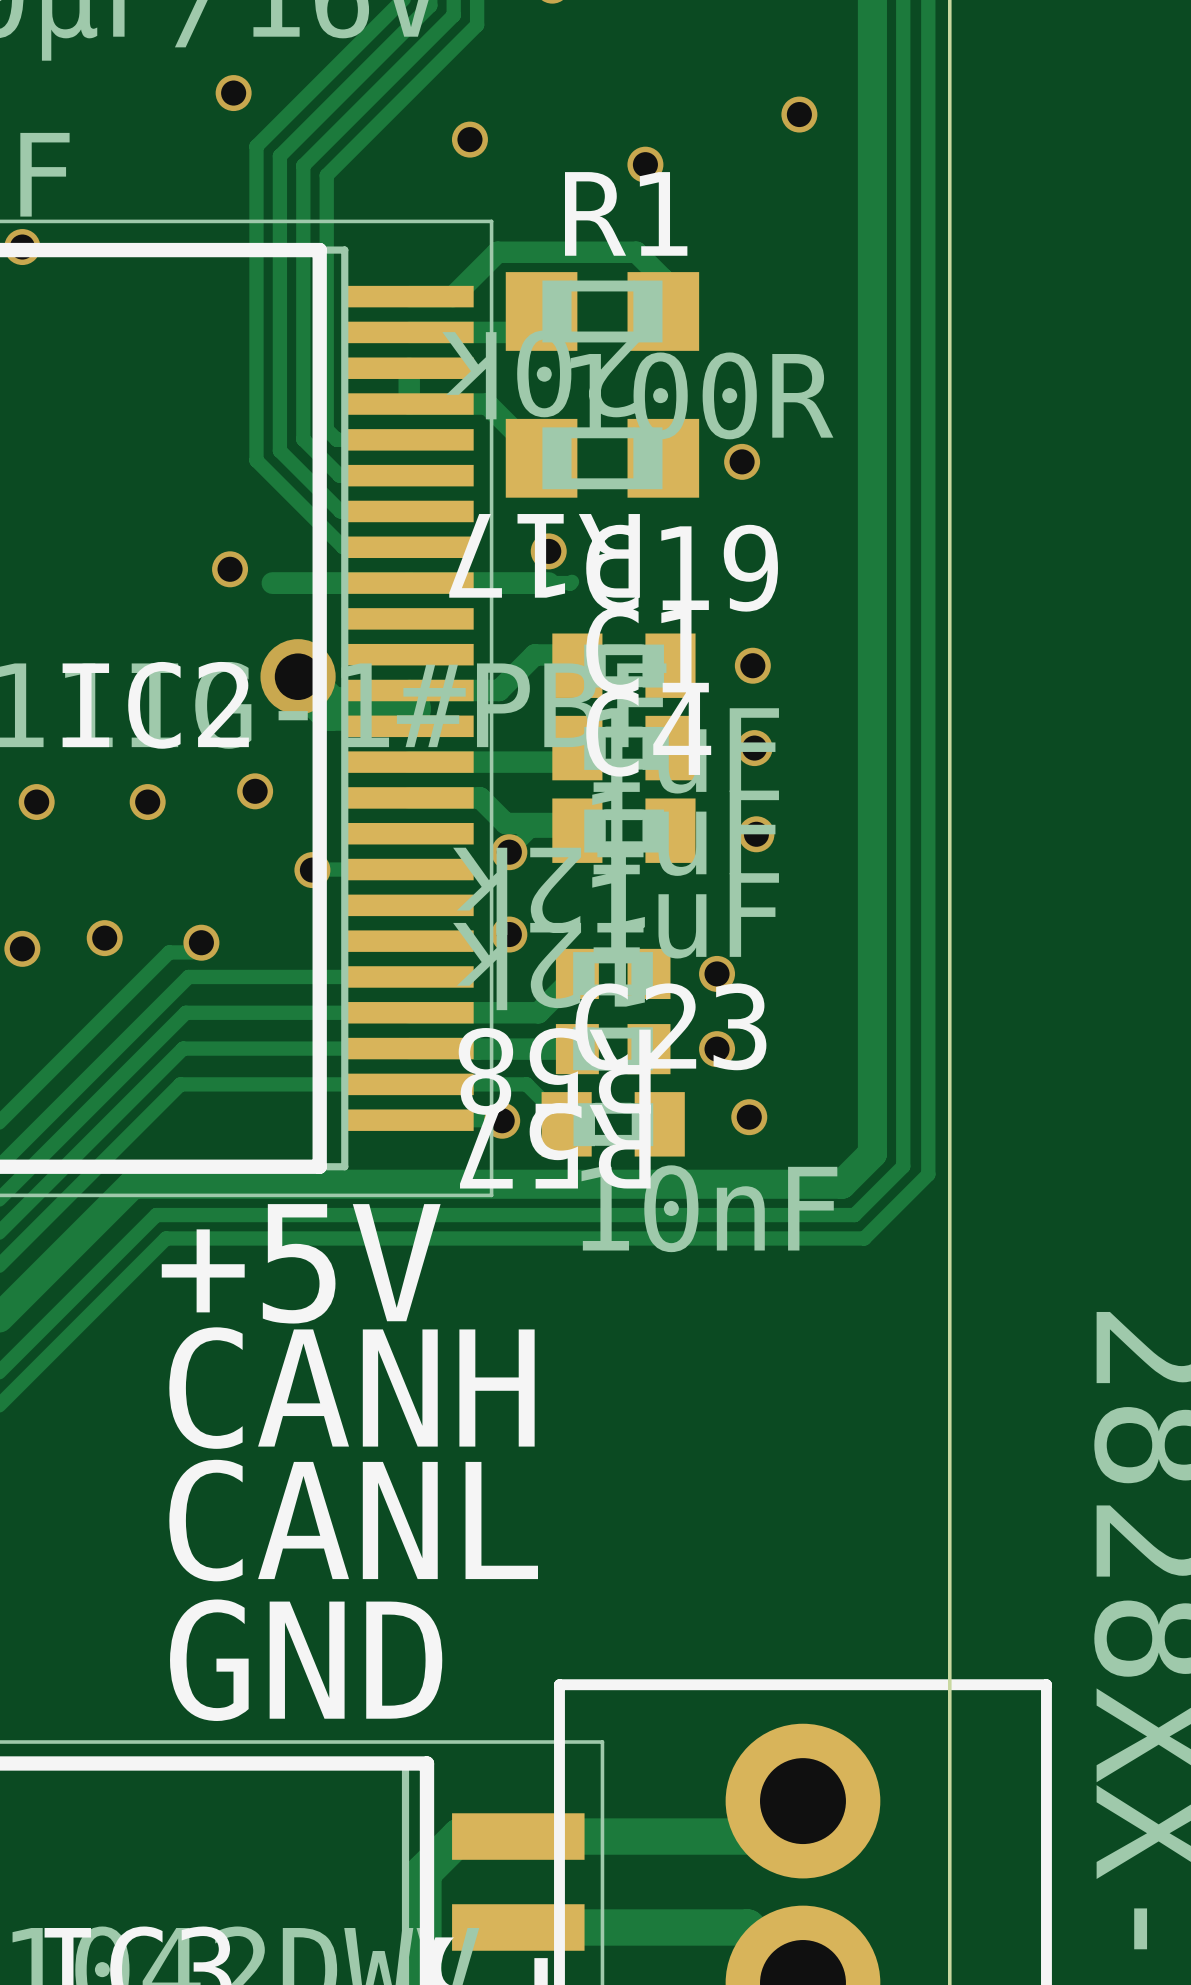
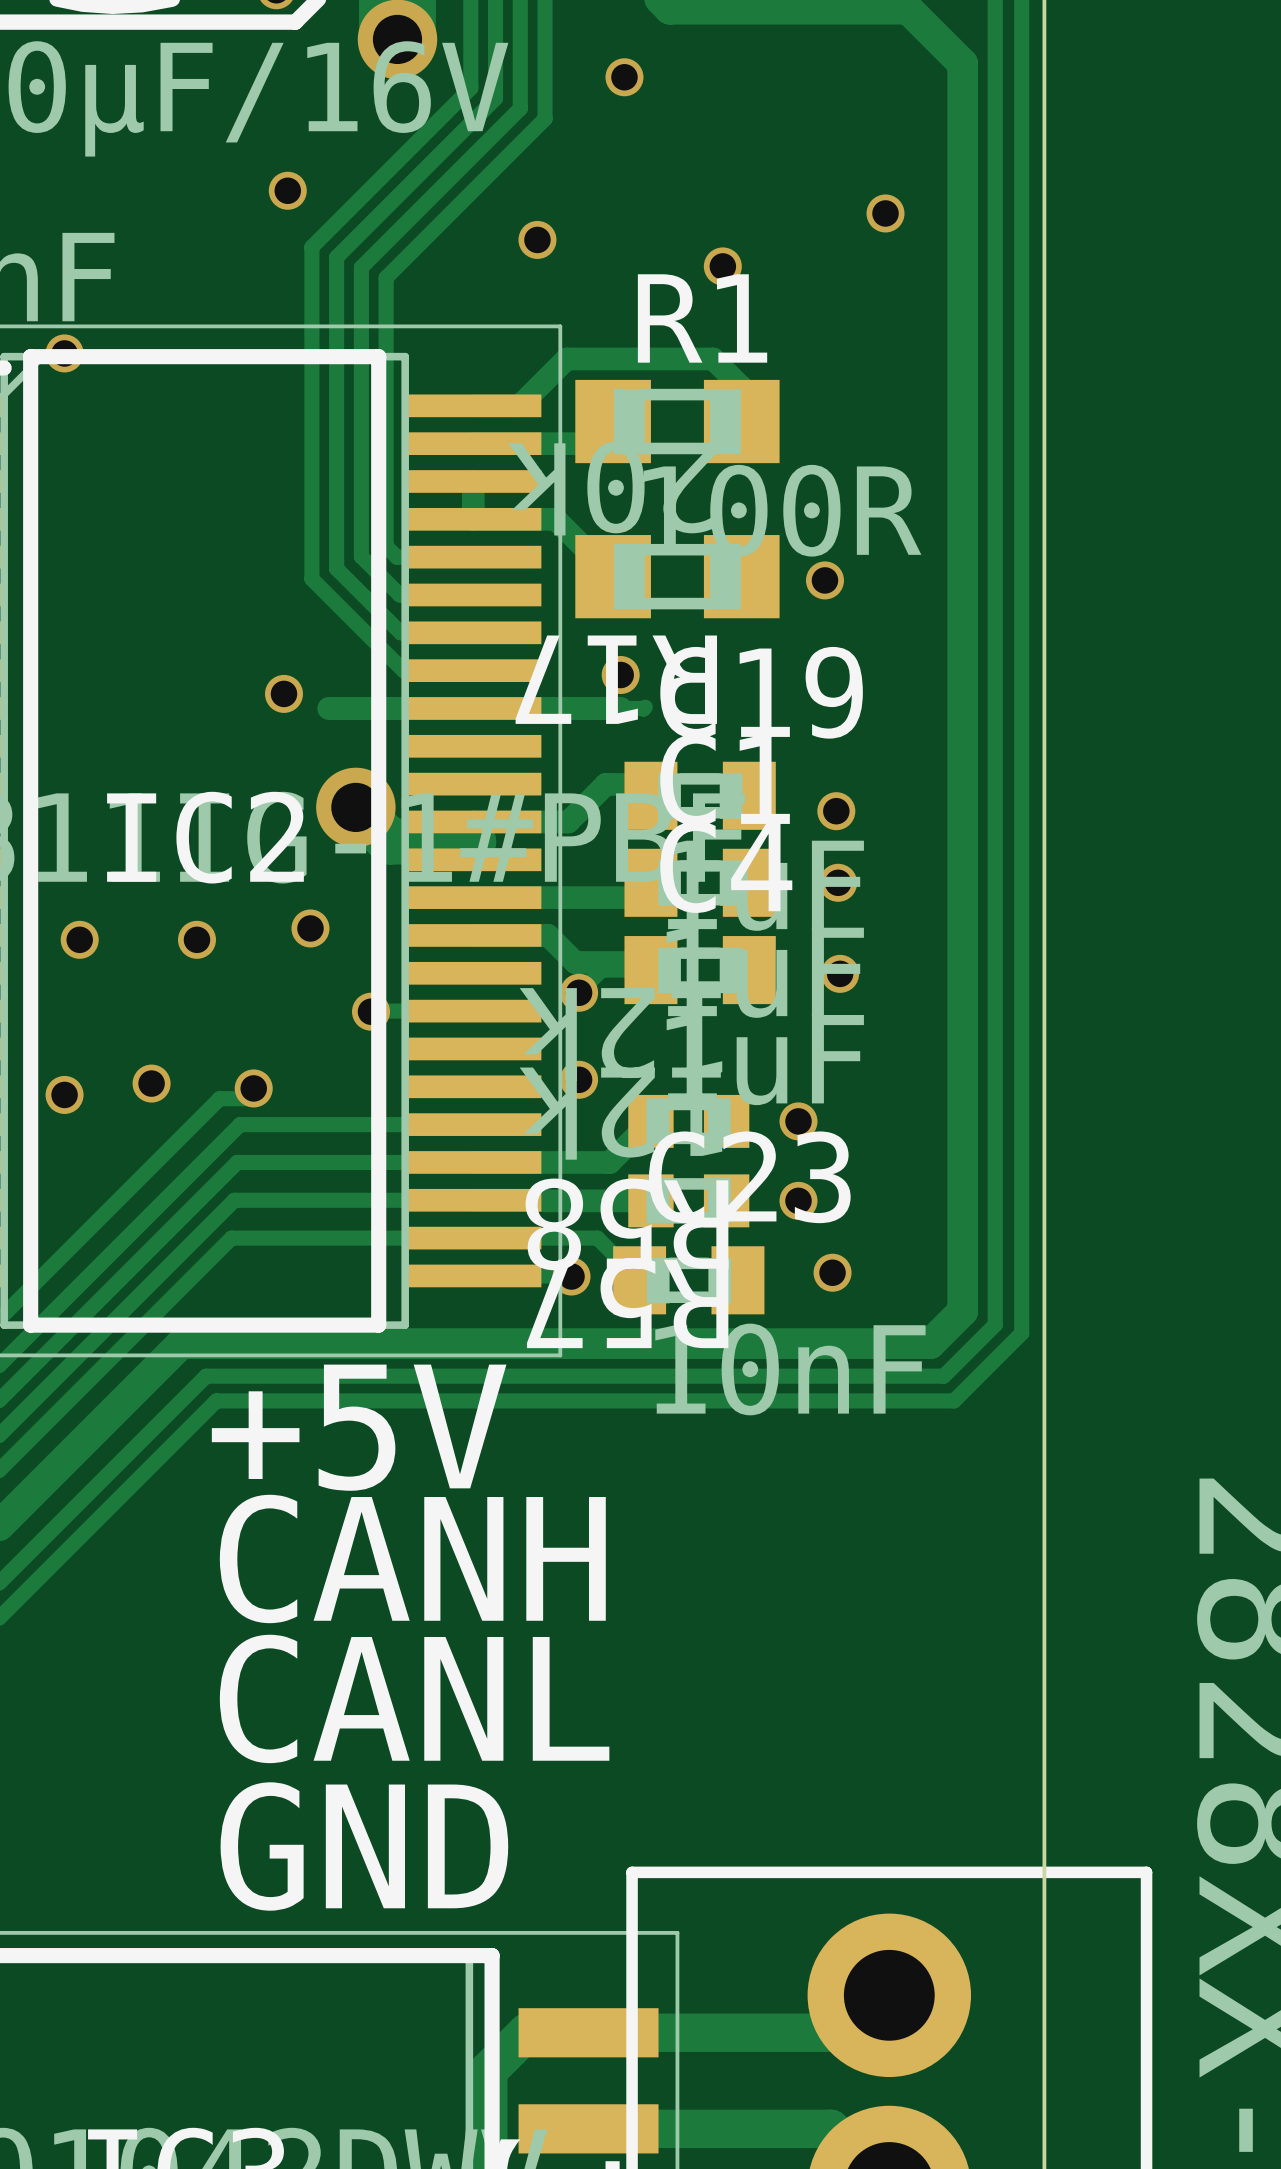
via position: (752, 665) -> (836, 811)

